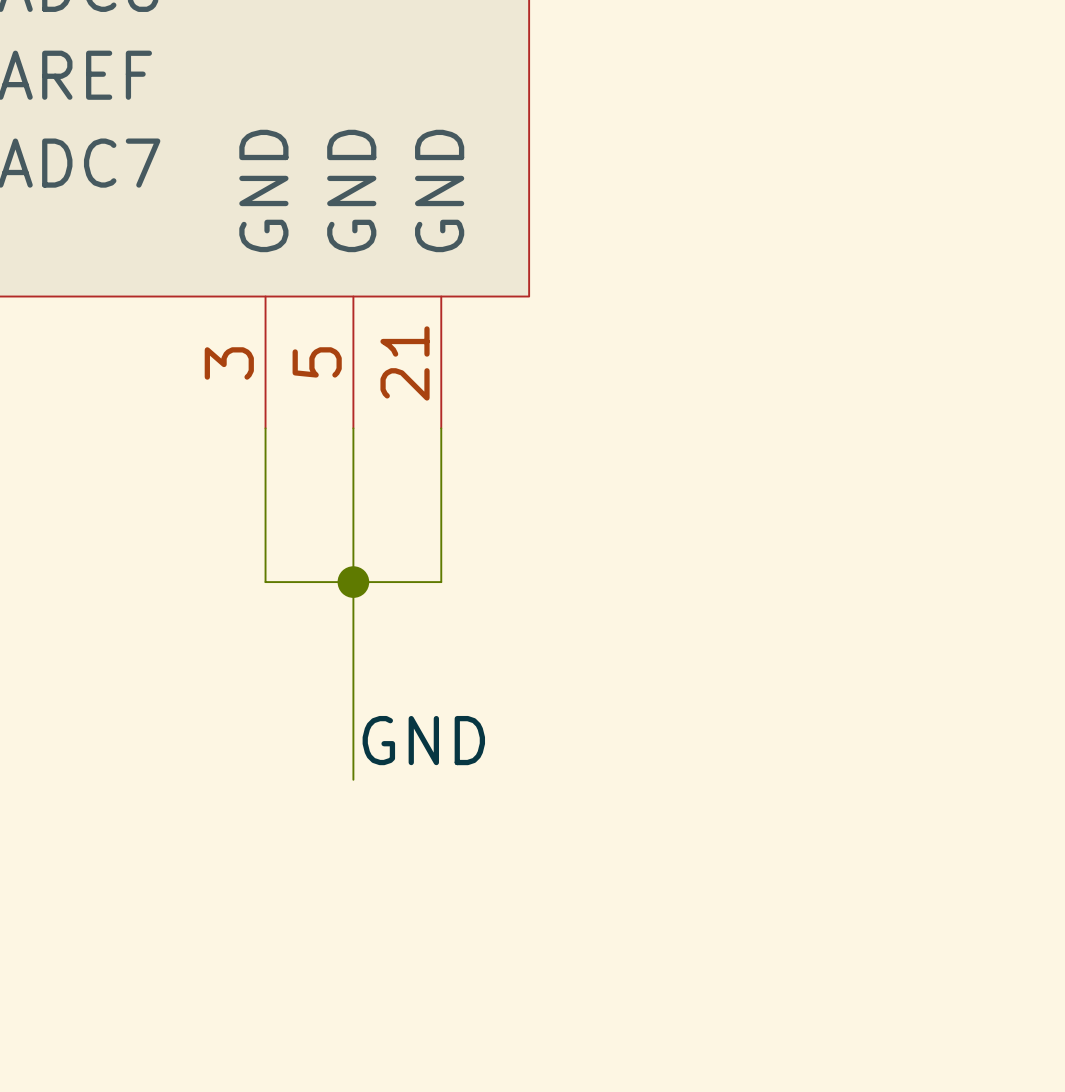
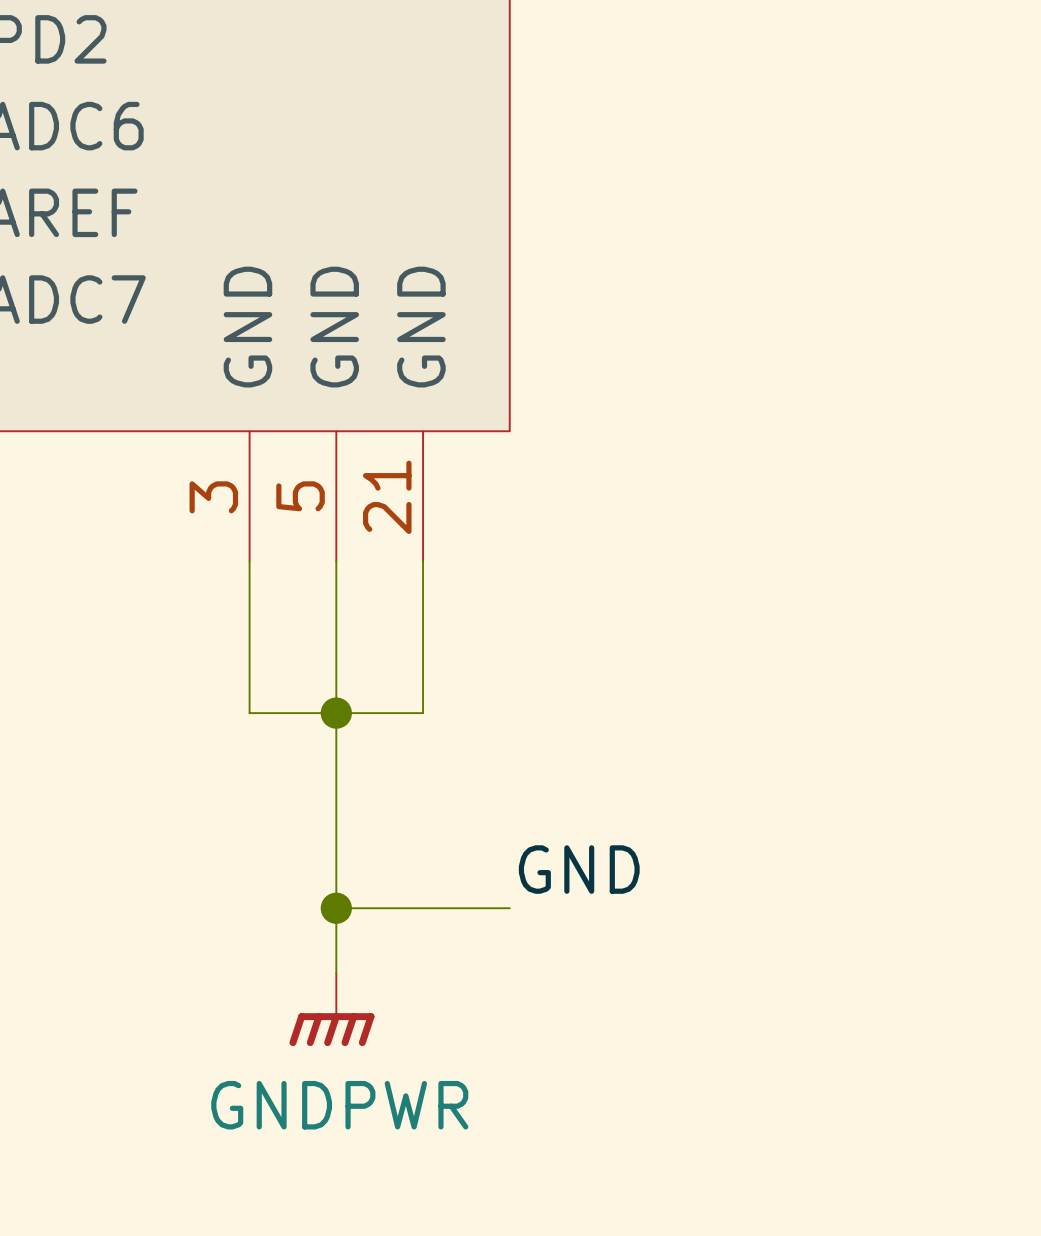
label position: GND (423, 740) -> GND (579, 869)
junction: none -> (336, 908)
wire: none -> (509, 908) (336, 908) (336, 973)
power symbol: none -> GNDPWR (331, 1009)

